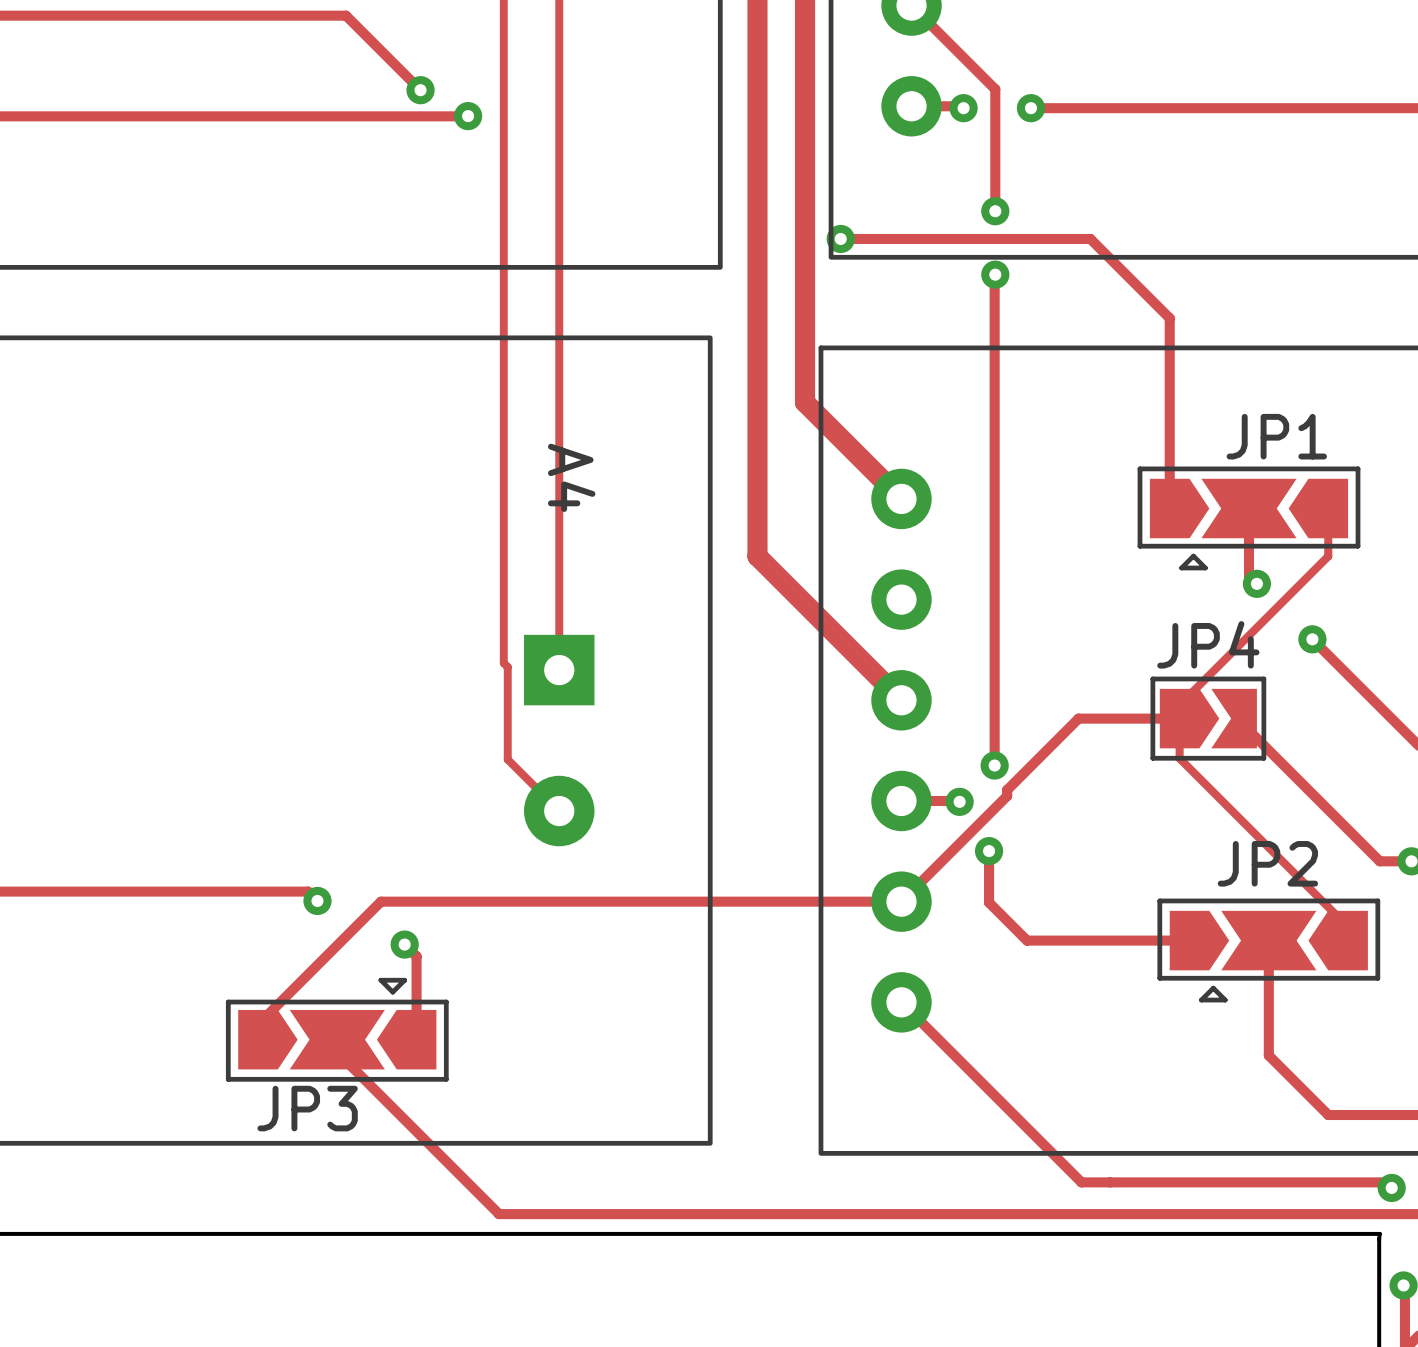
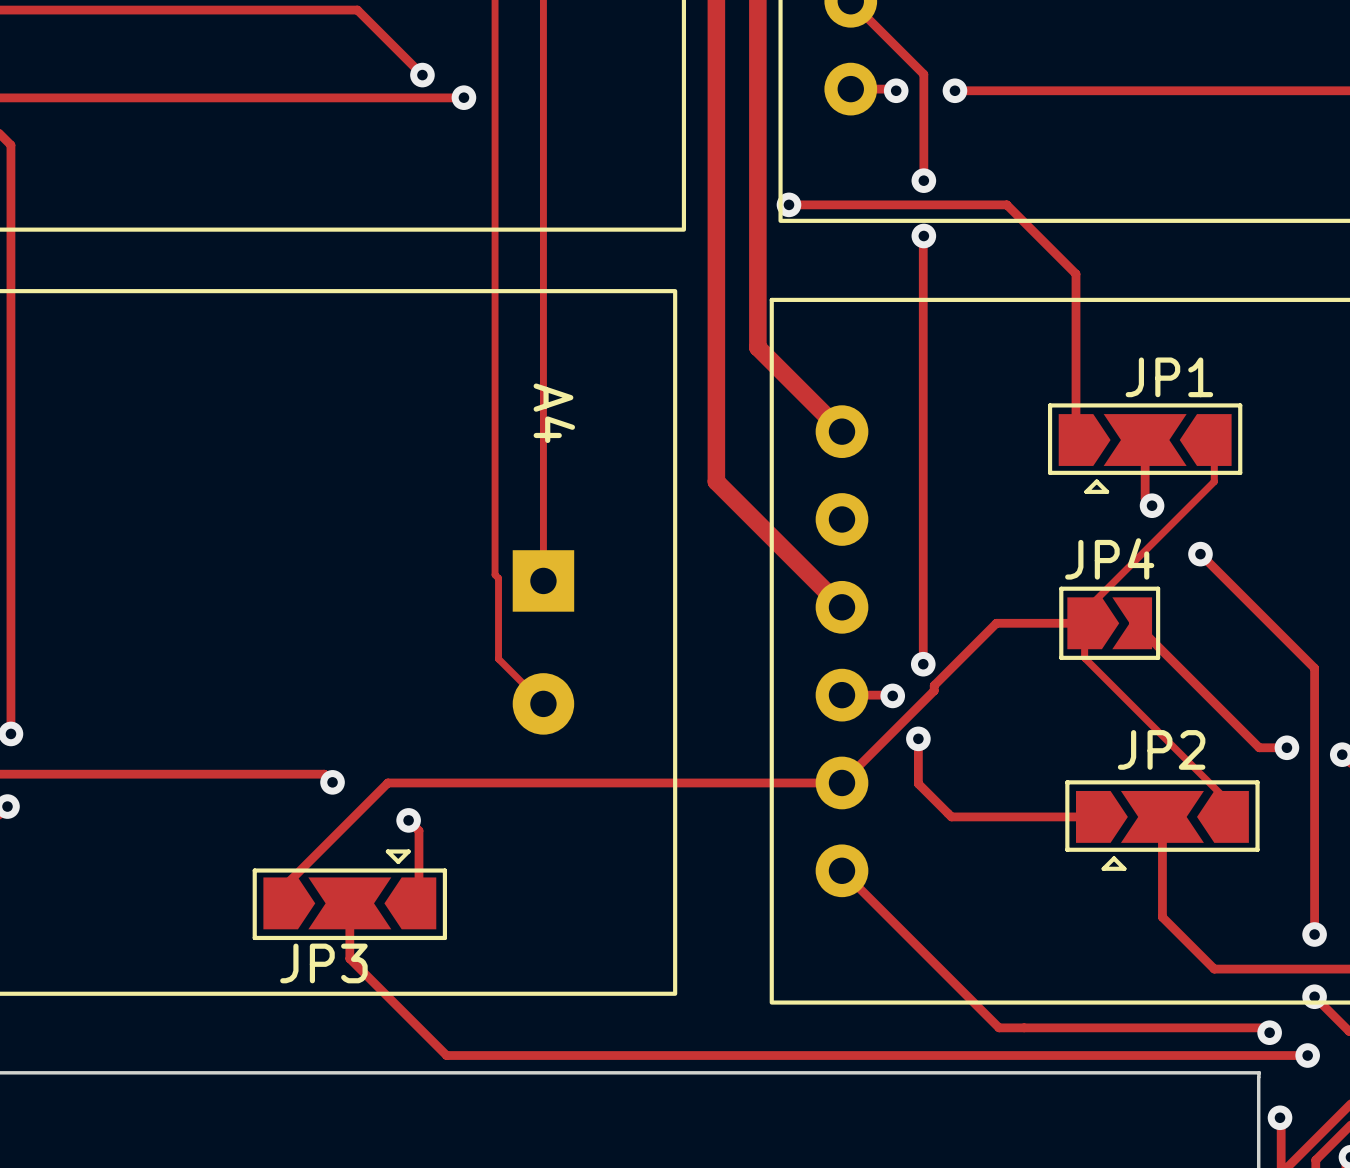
track: (337, 1052) (499, 1214) -> (349, 914) (349, 958) (446, 1055) (490, 1055)

